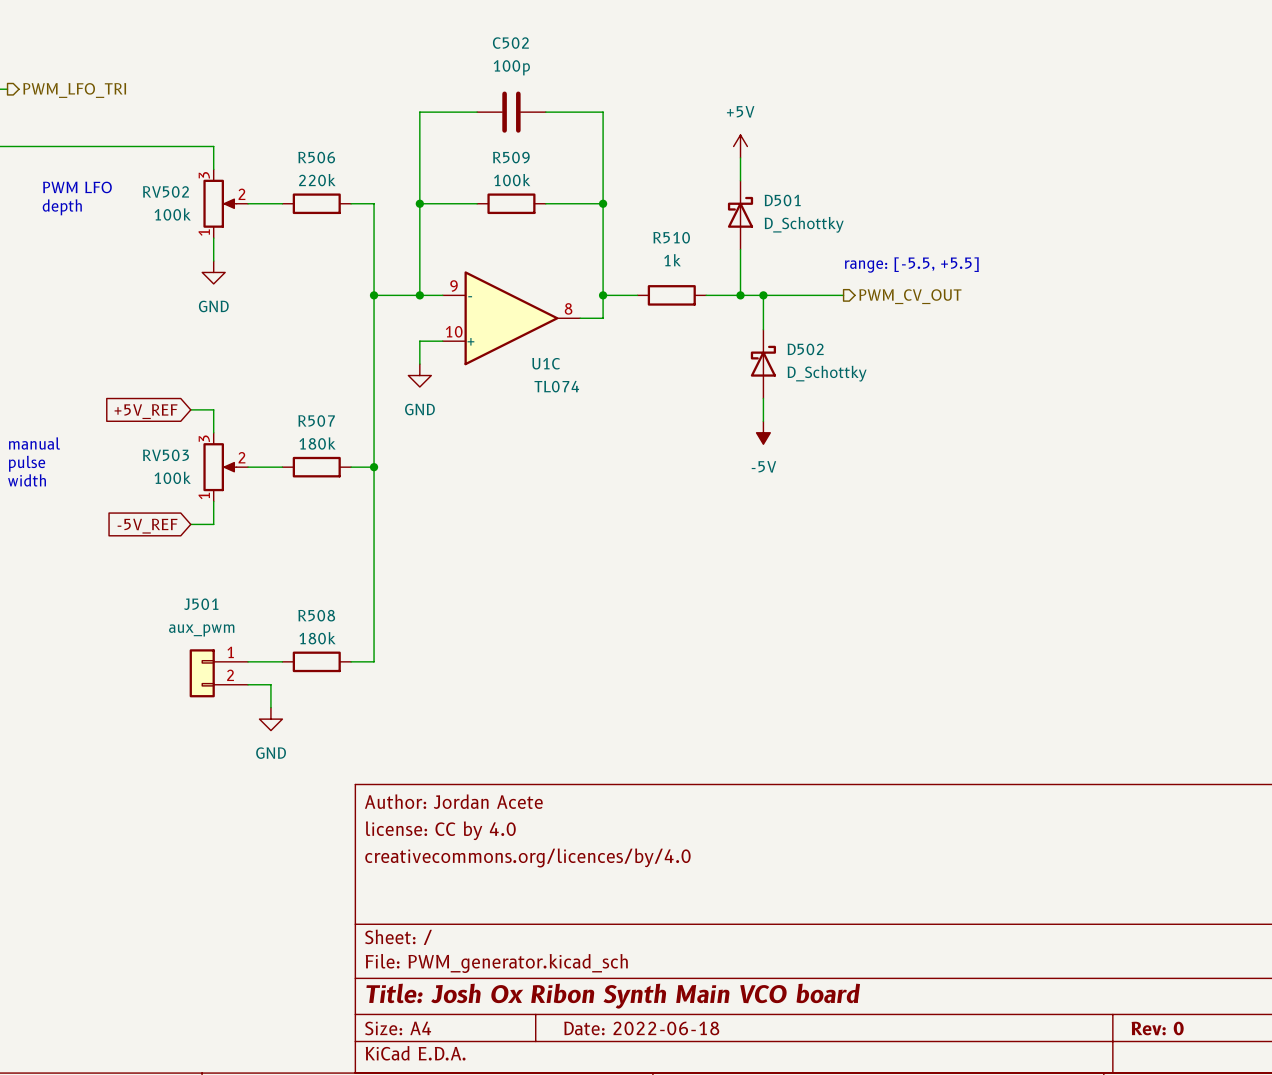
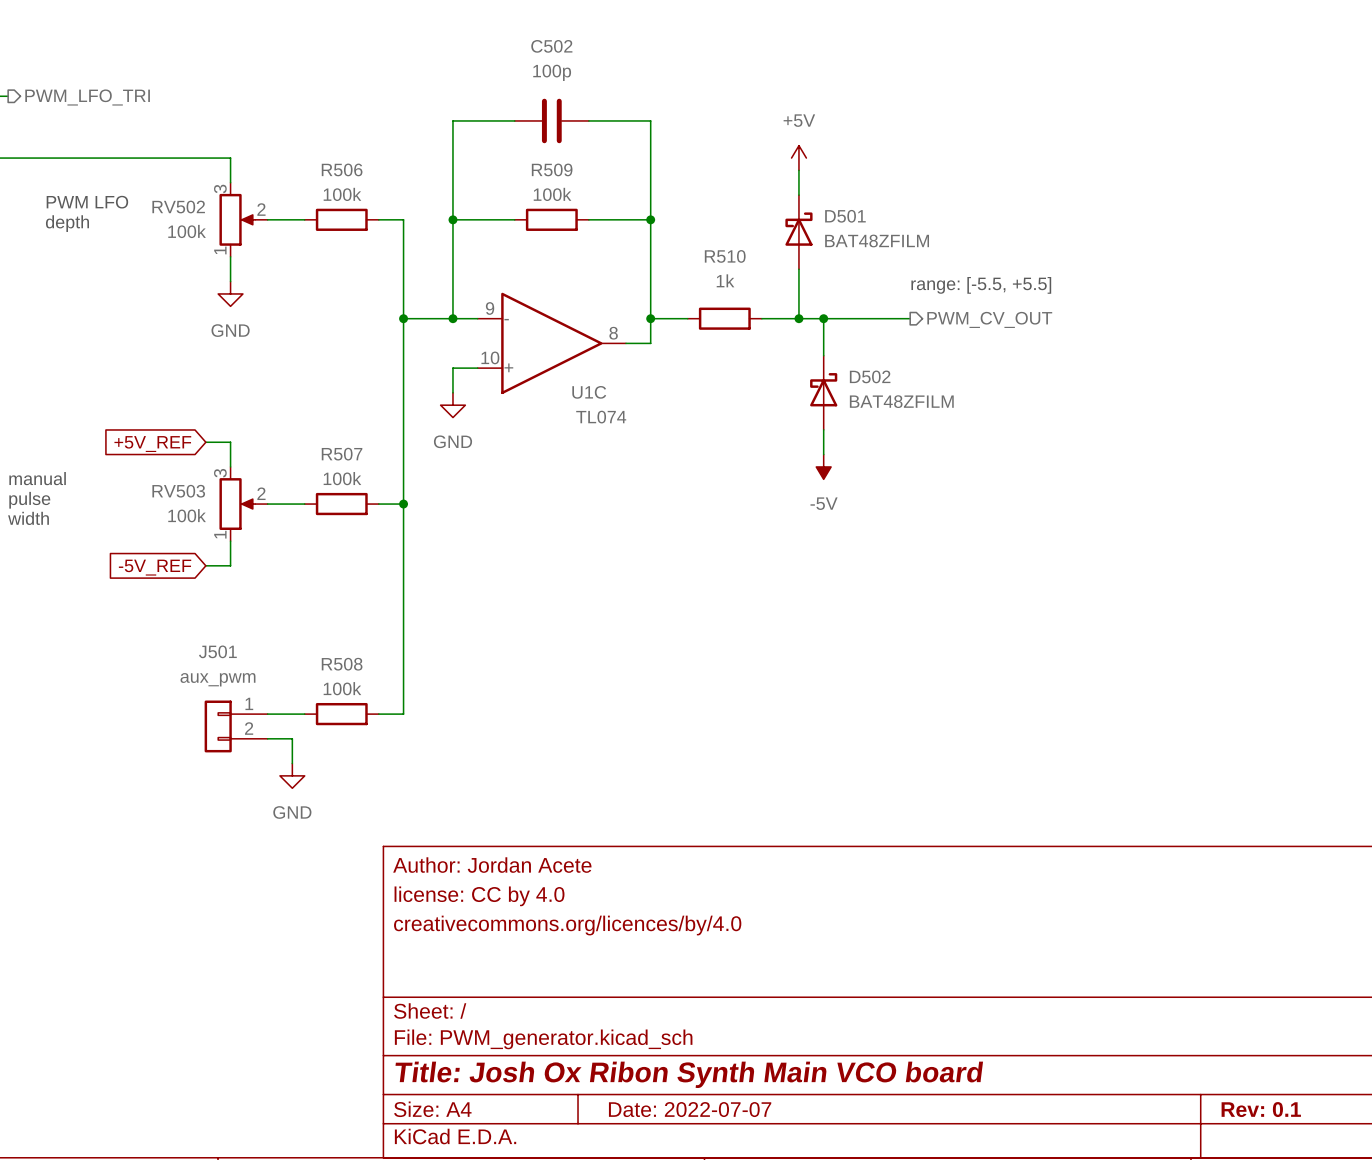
R506 value: 220k (317, 180) -> 100k (342, 194)
D501 value: D_Schottky (804, 224) -> BAT48ZFILM (877, 240)
D502 value: D_Schottky (827, 373) -> BAT48ZFILM (901, 401)
R507 value: 180k (317, 443) -> 100k (342, 478)
R508 value: 180k (317, 638) -> 100k (342, 688)
title block: Date: 2022-06-18 (641, 1028) -> Date: 2022-07-07 (690, 1109)
title block: Rev: 0 (1157, 1028) -> Rev: 0.1 (1261, 1109)

